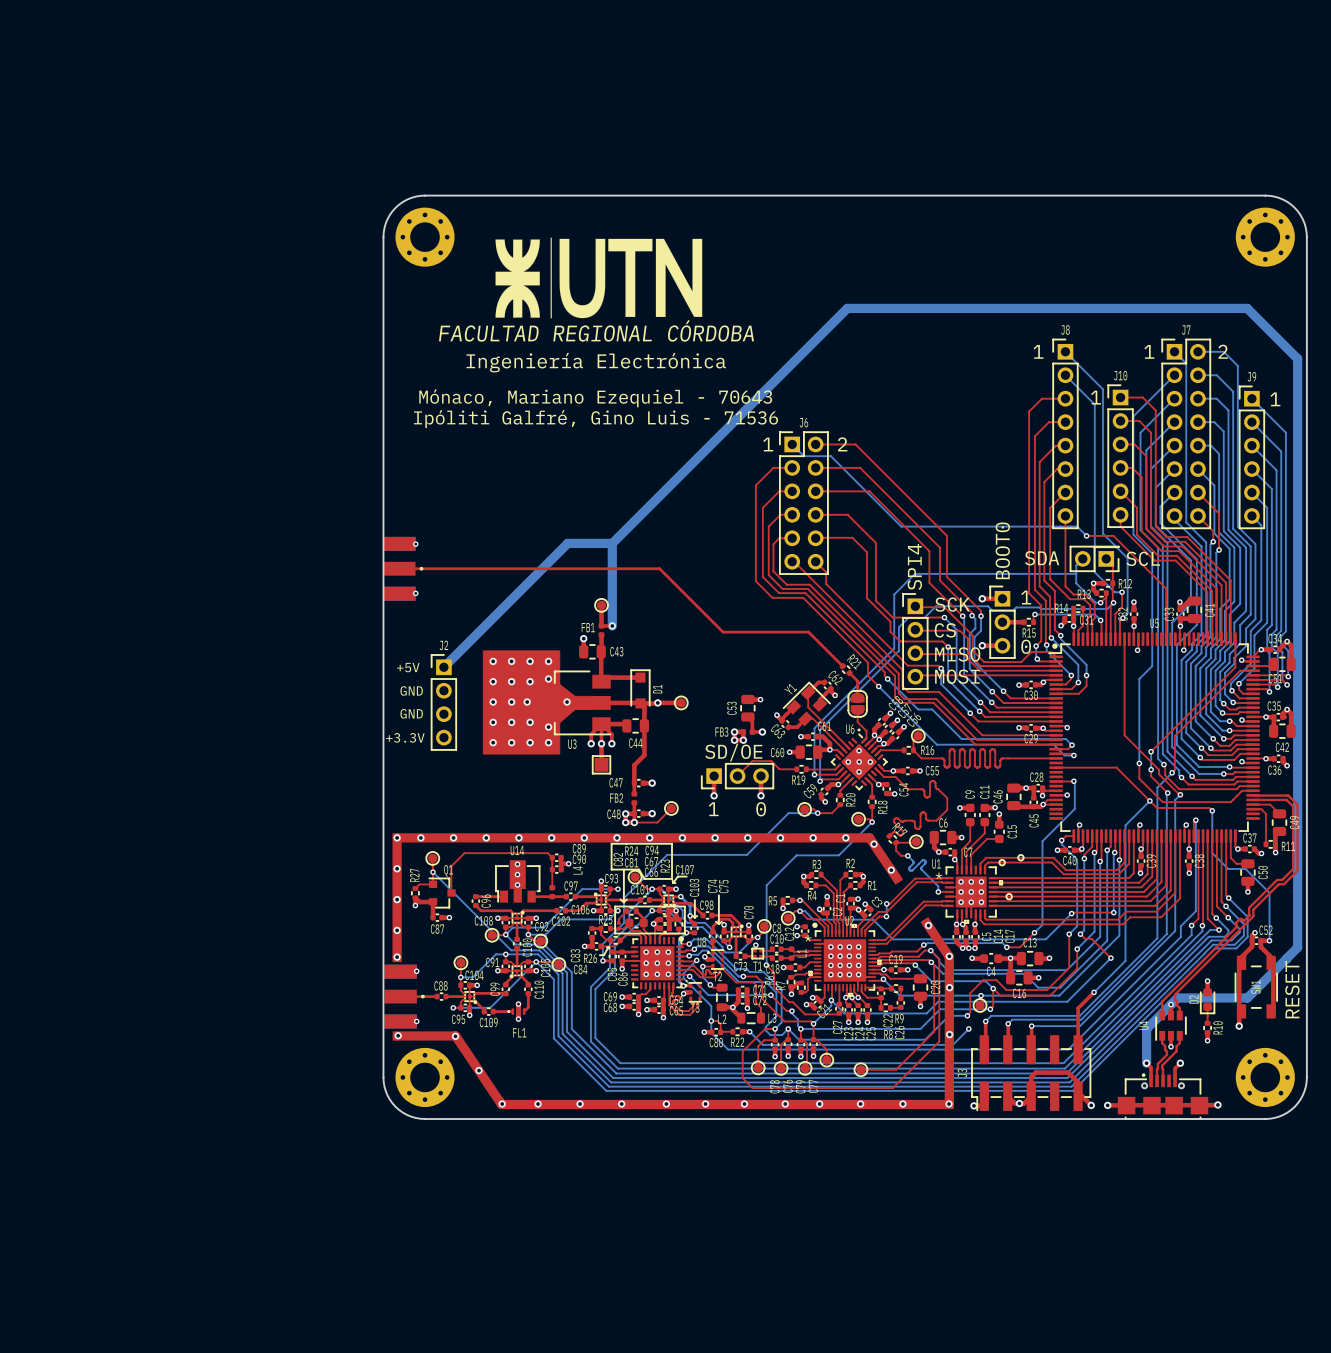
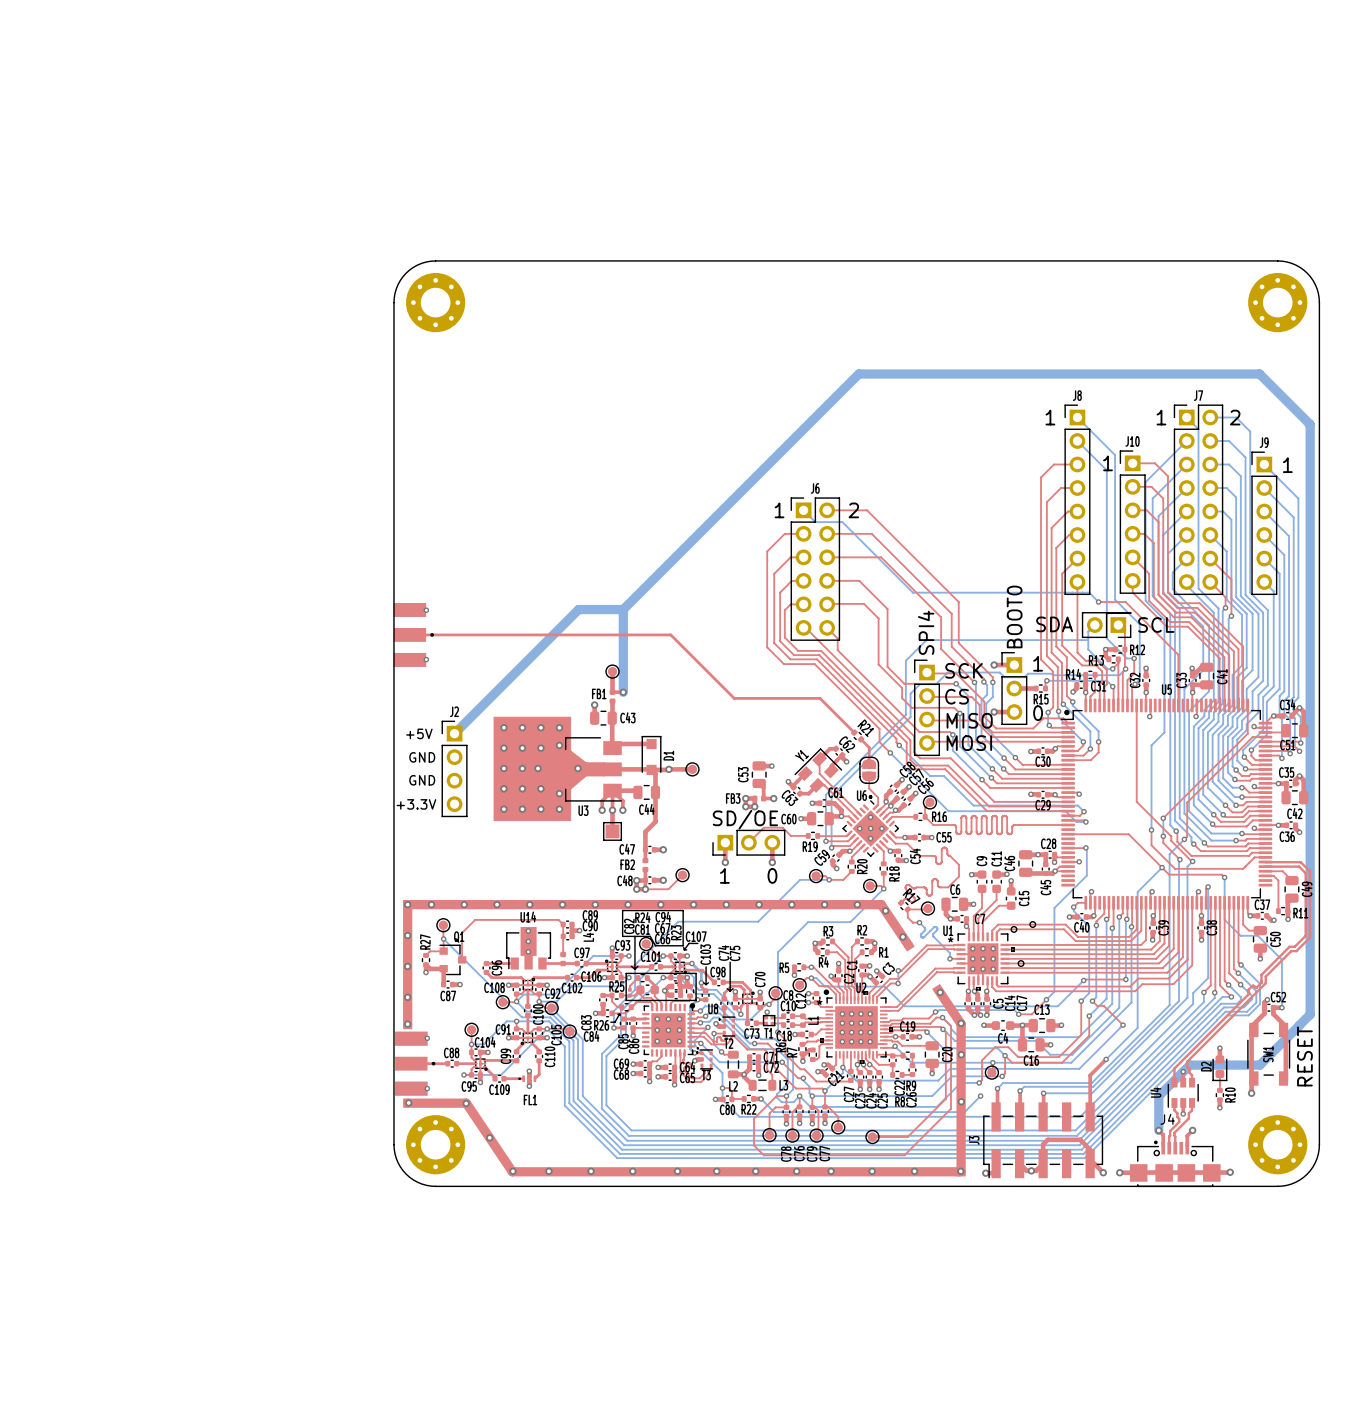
drawing: [495, 237, 703, 319] -> none
text: FACULTAD REGIONAL CÓRDOBA (596, 330) -> none
text: Ingeniería Electrónica (596, 362) -> none
text: Mónaco, Mariano Ezequiel - 70643 (595, 398) -> none
text: Ipóliti Galfré, Gino Luis - 71536 (596, 419) -> none
J4 name: none -> J4 (1167, 1119)

